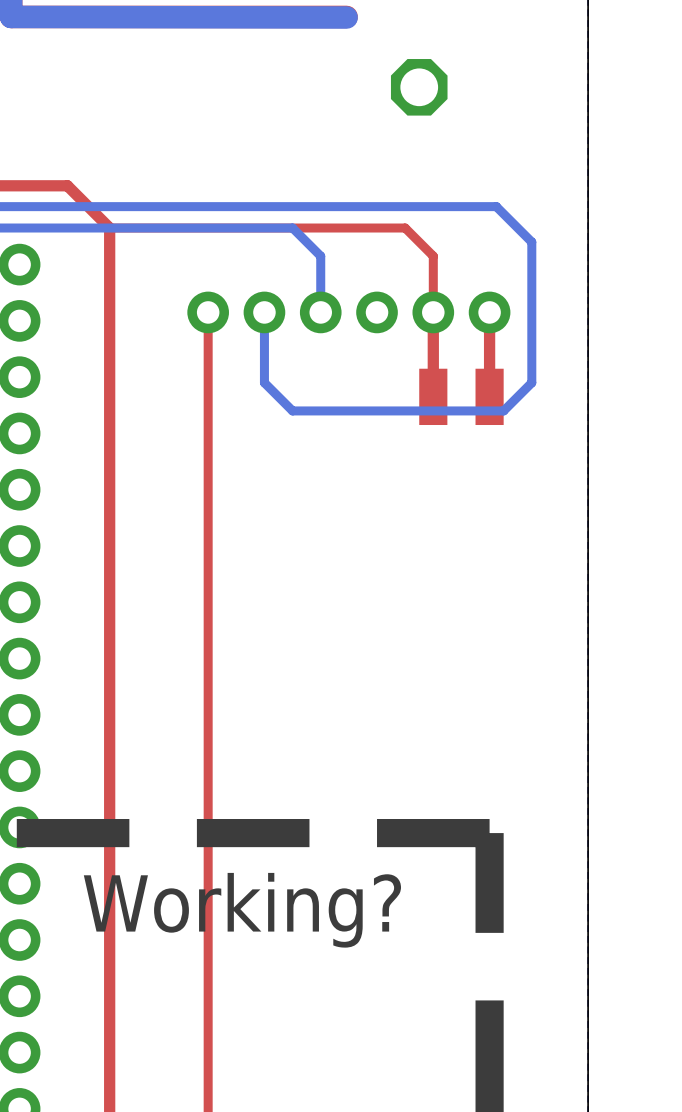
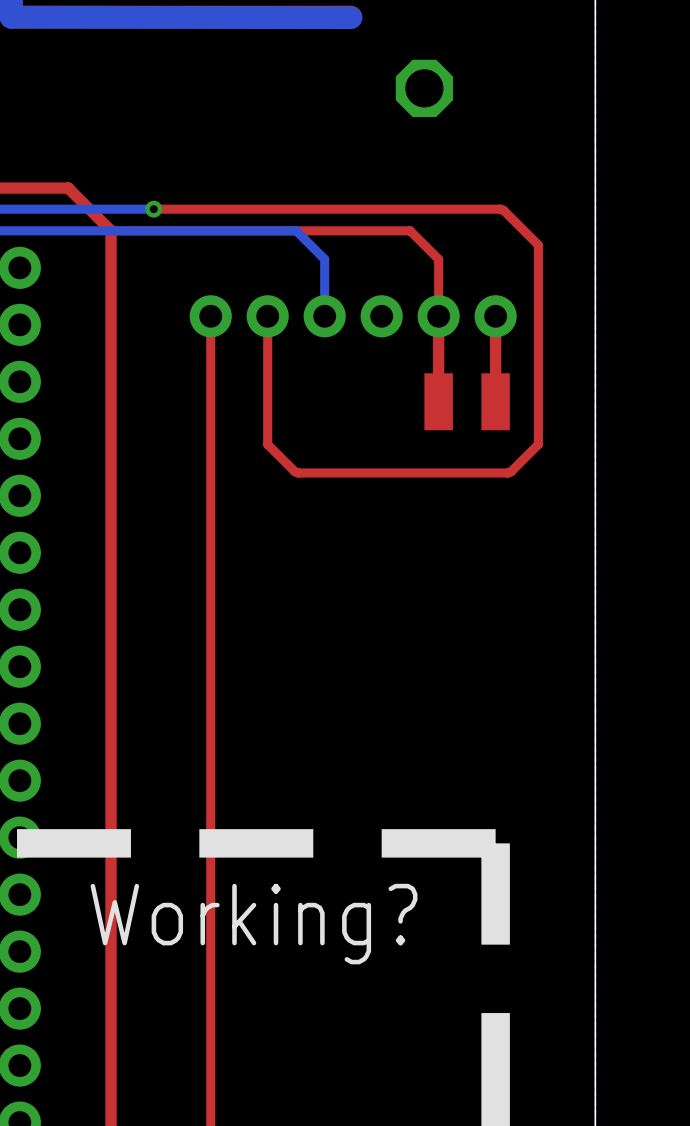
top track: none -> (153, 209) (502, 209) (538, 245) (538, 444) (508, 472) (296, 472) (267, 444) (267, 316)
bottom track: (151, 206) (496, 206) (531, 242) (531, 382) (503, 410) (292, 410) (264, 382) (264, 312) -> none
via: none -> (153, 209)

